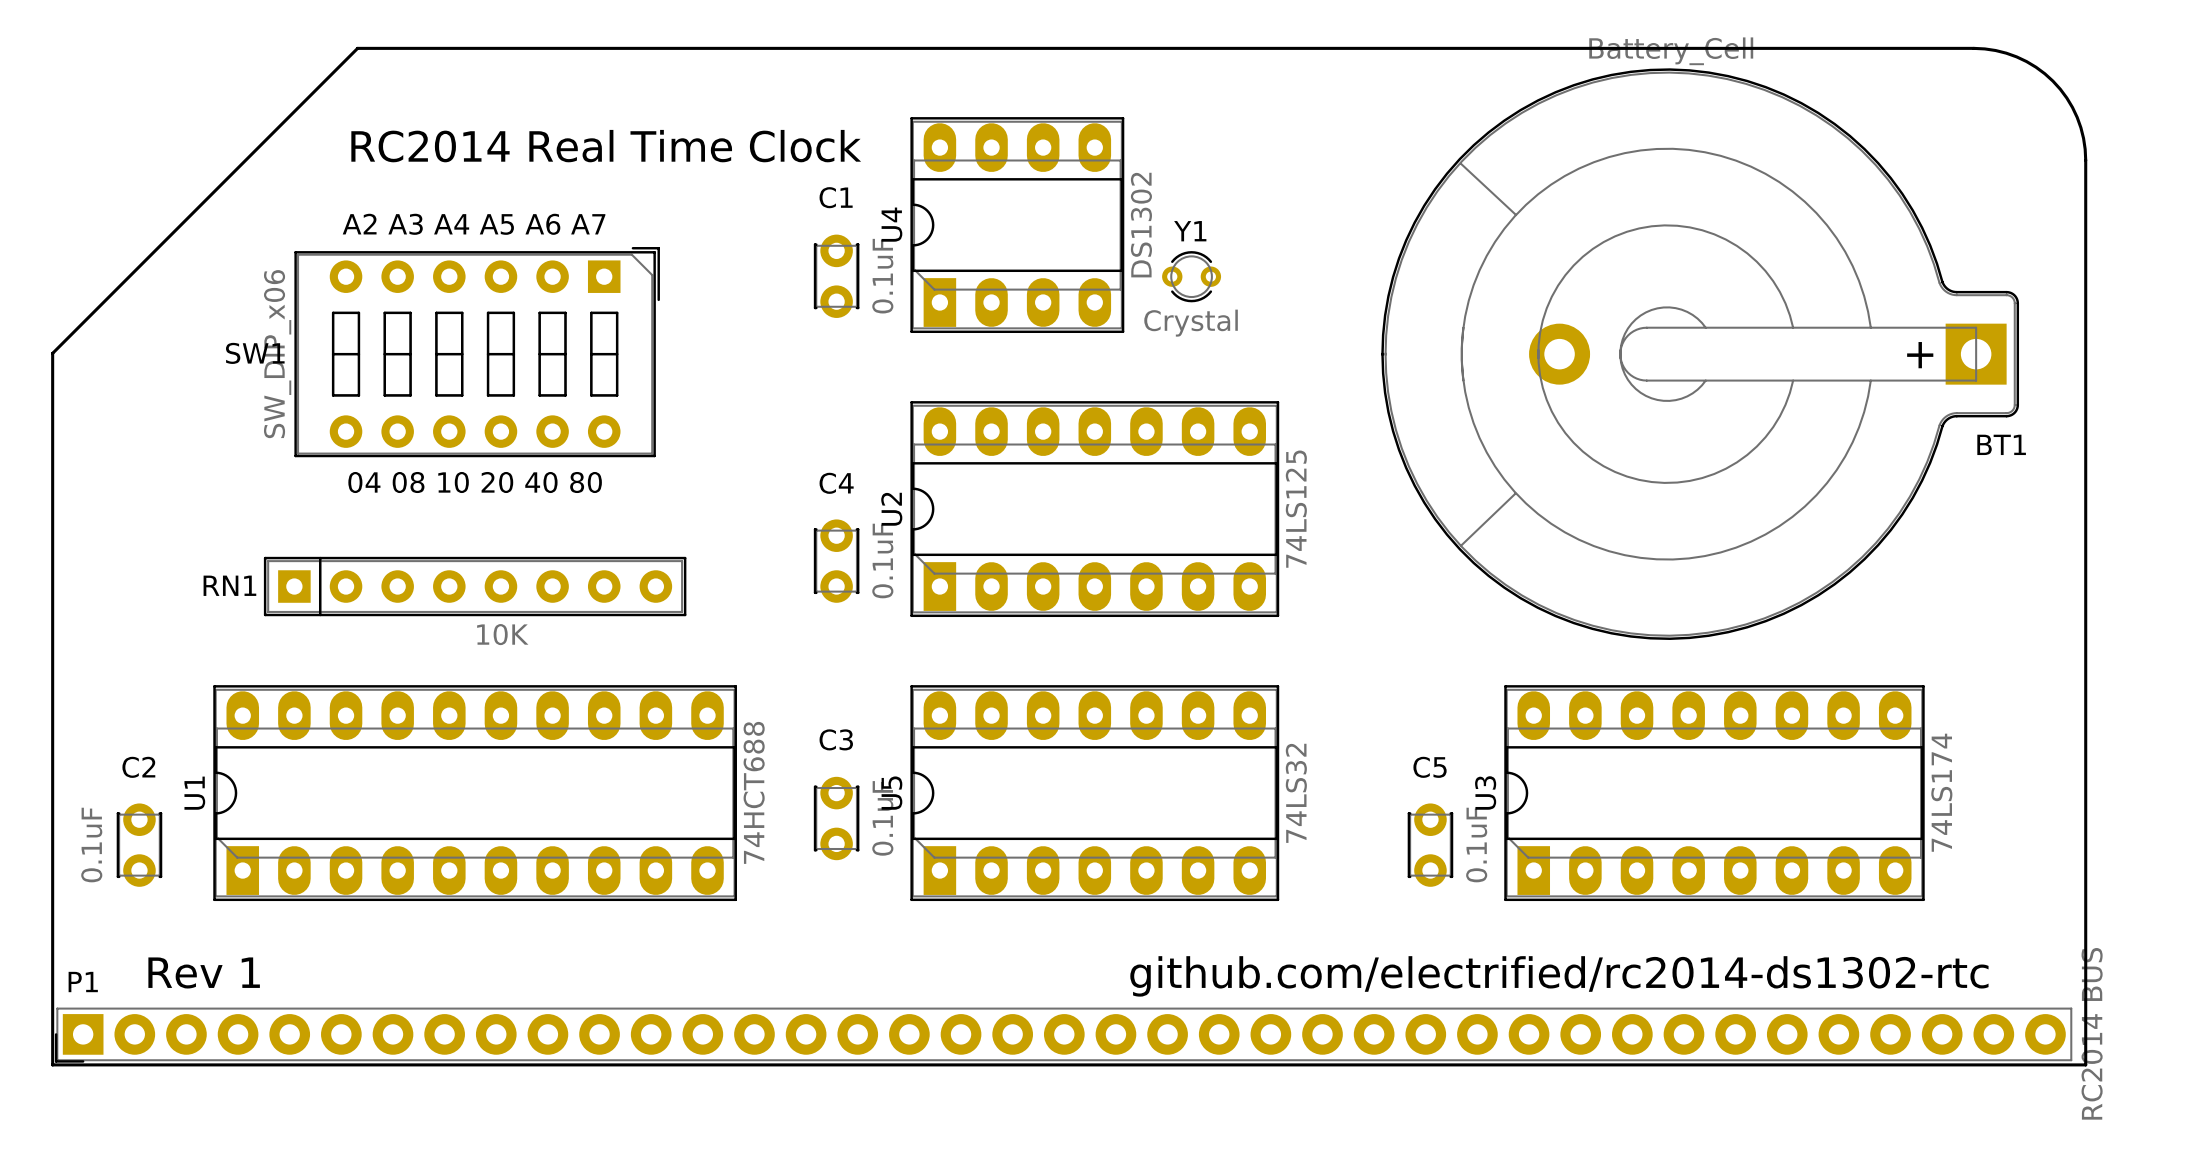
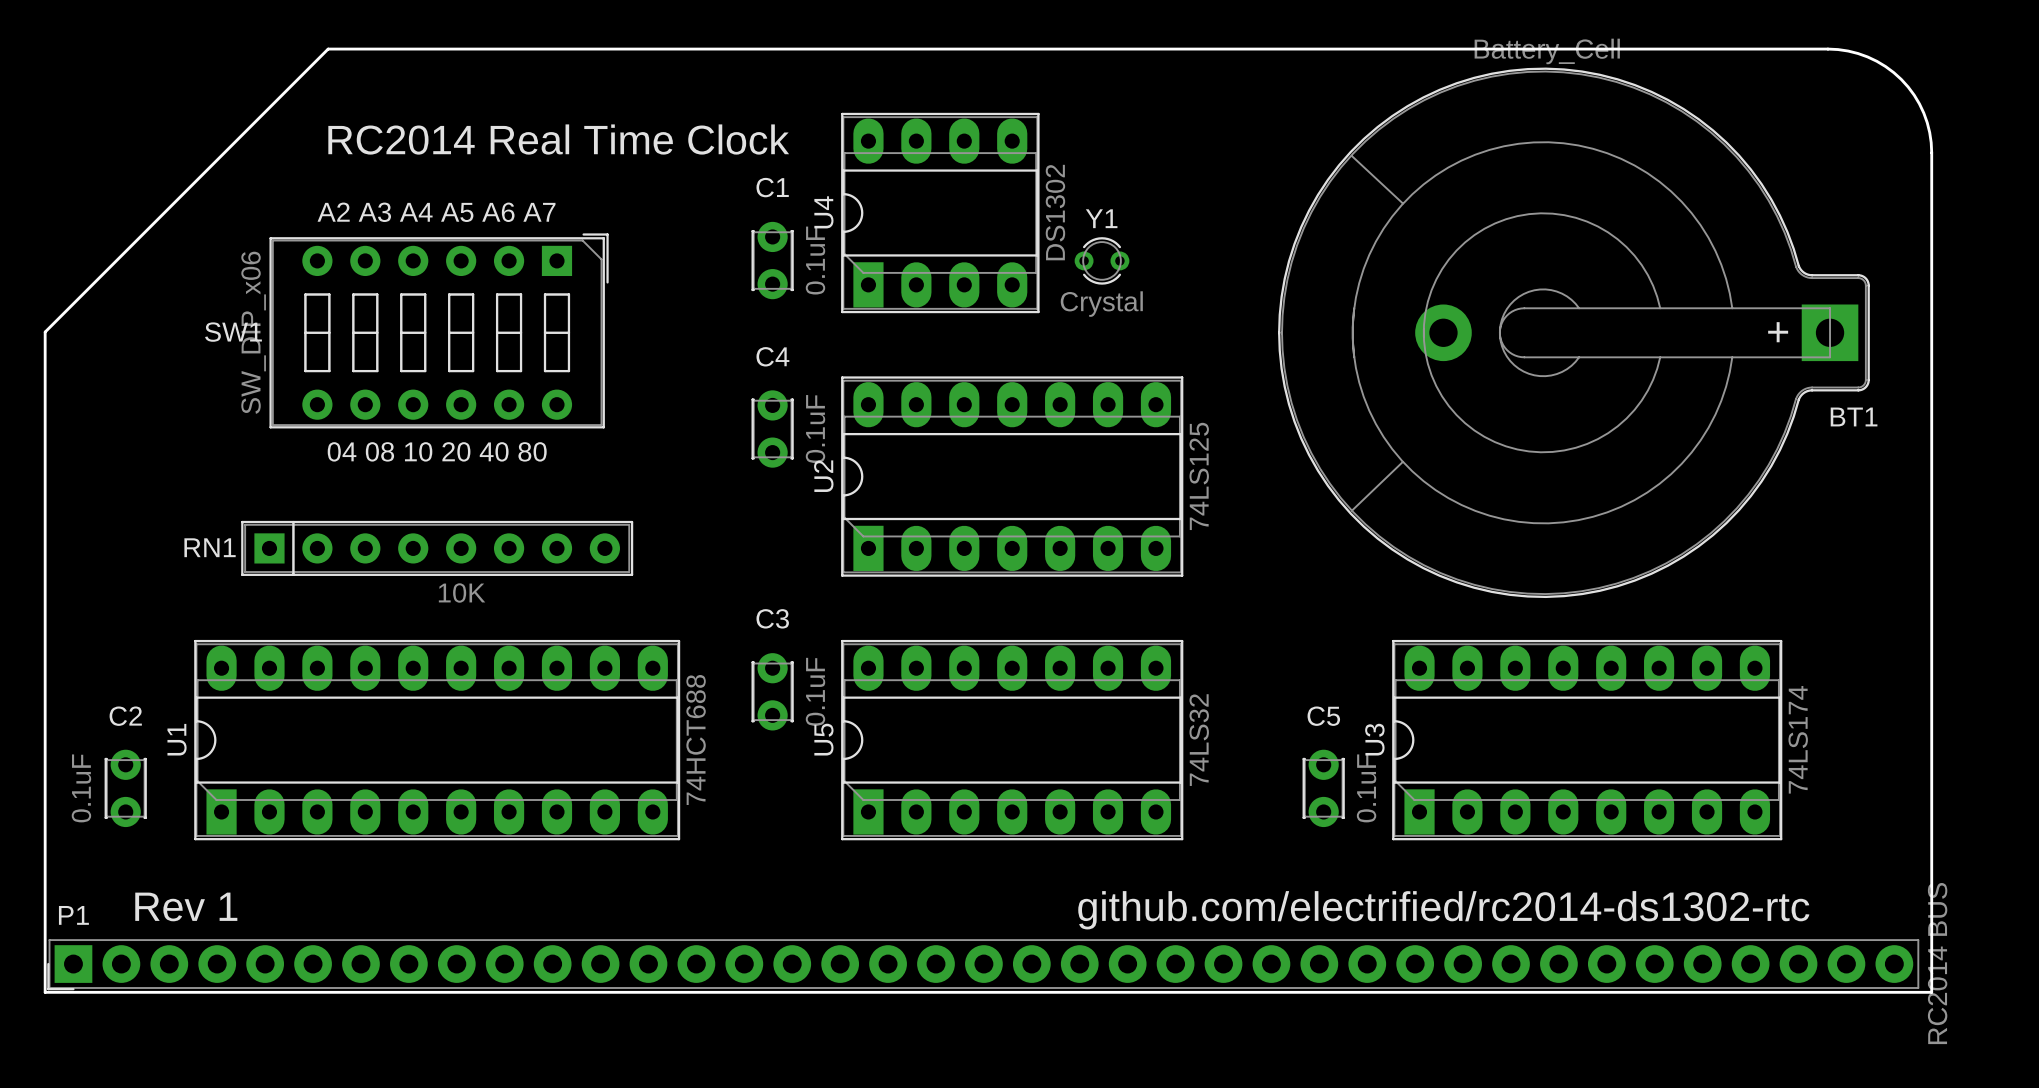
C4 position: (836, 561) -> (772, 429)
C3 position: (836, 818) -> (772, 691)

